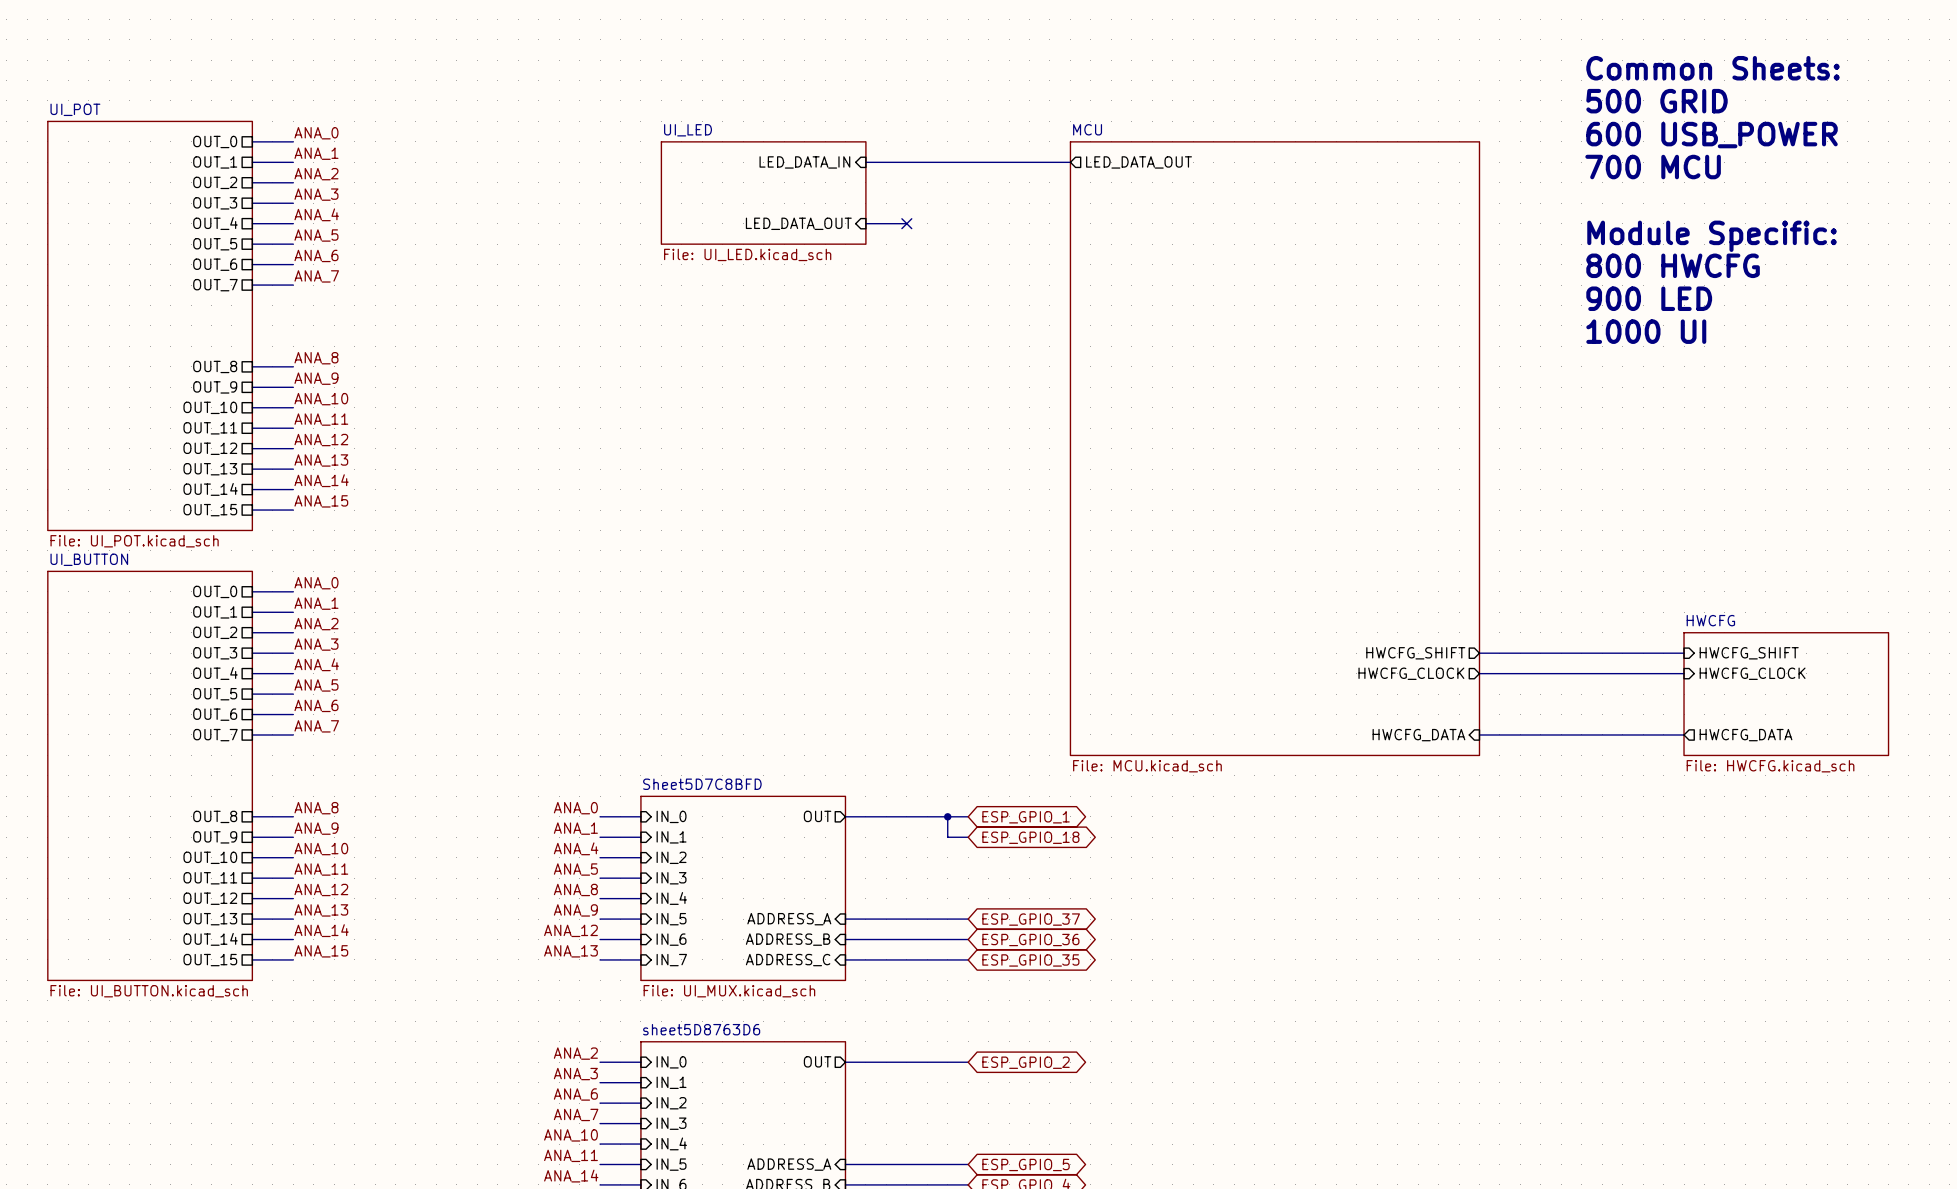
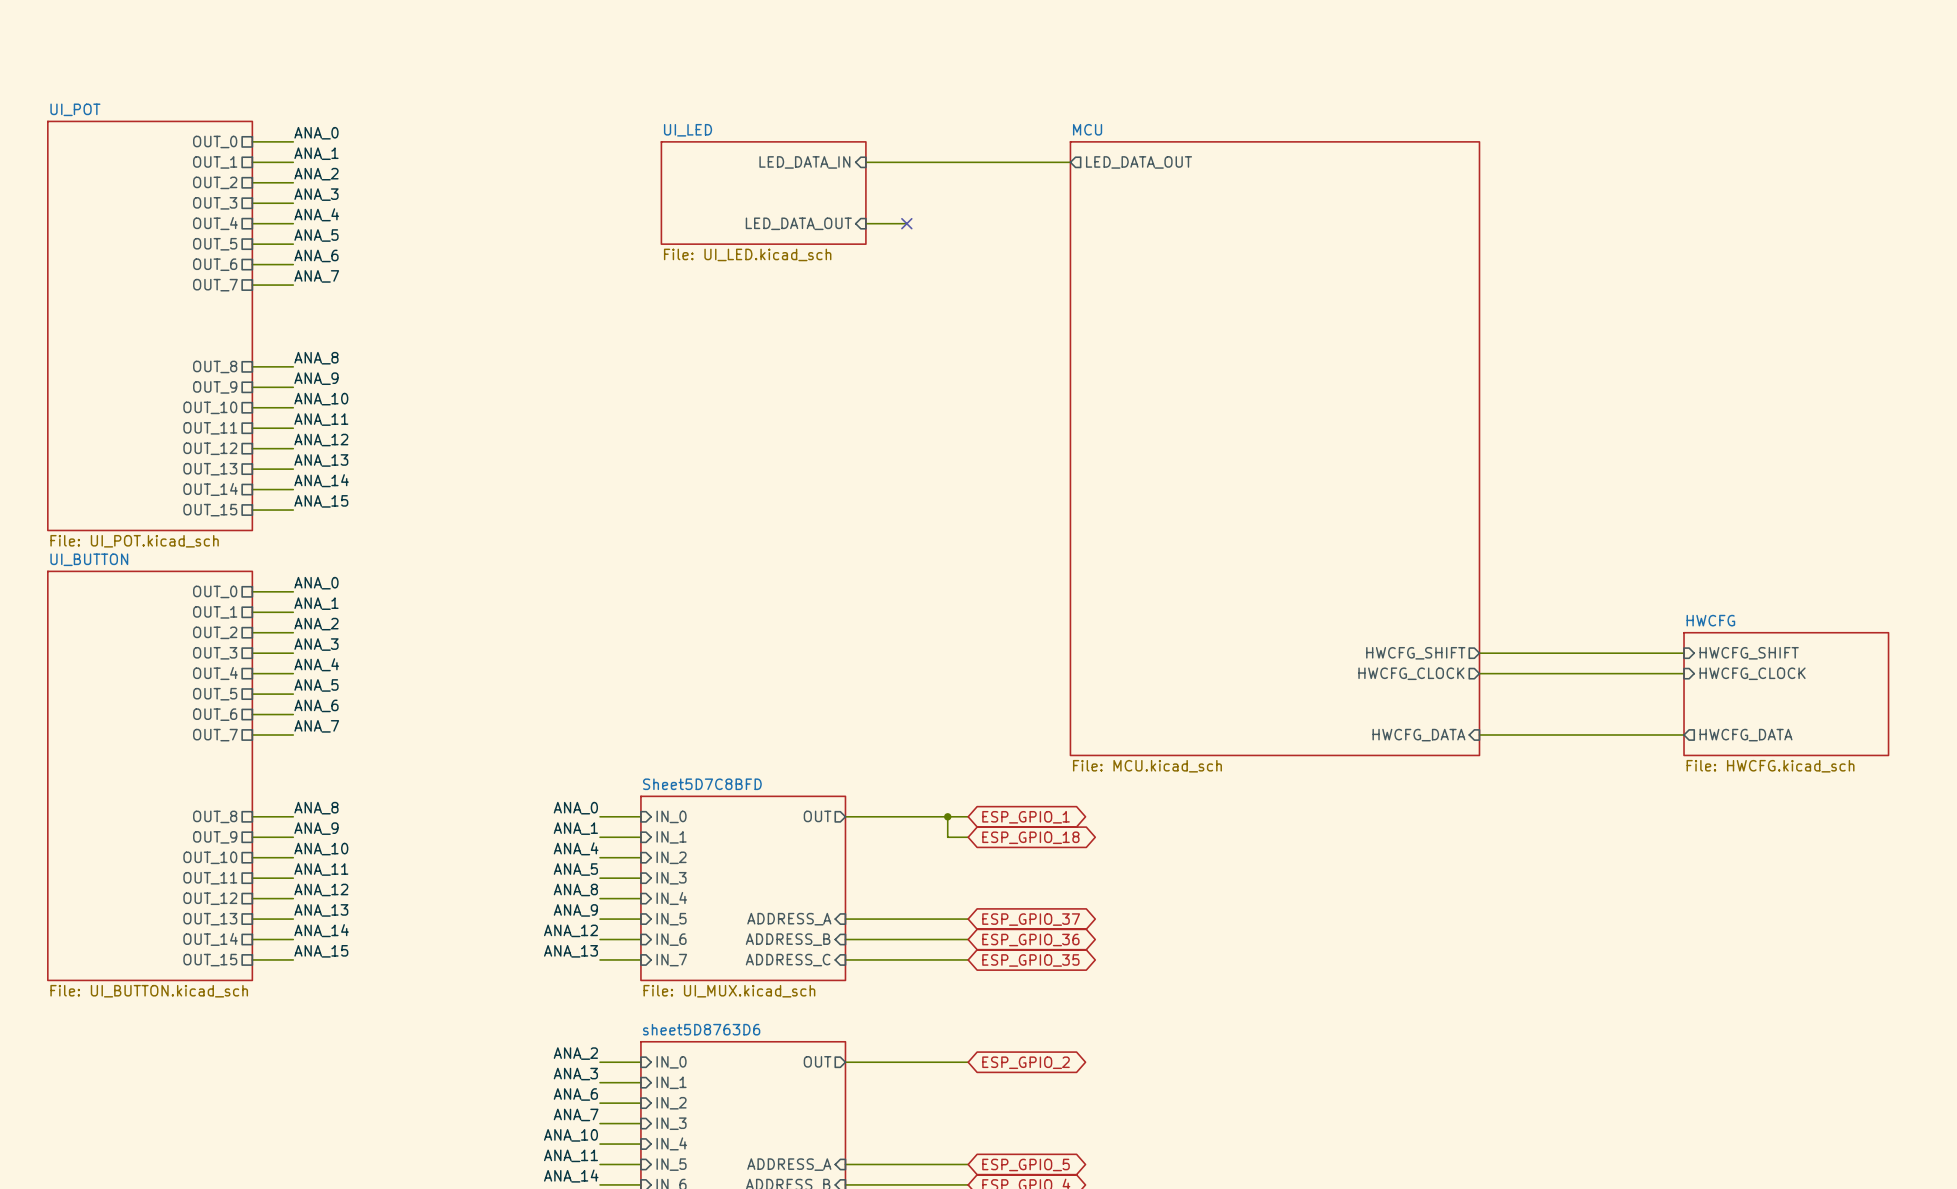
text: Common Sheets: (1712, 68) -> none
text: 500 GRID (1656, 101) -> none
text: 600 USB_POWER (1712, 135) -> none
text: 700 MCU (1653, 167) -> none
text: Module Specific: (1712, 236) -> none
text: 800 HWCFG (1673, 265) -> none
text: 900 LED (1649, 298) -> none
text: 1000 UI (1646, 331) -> none

